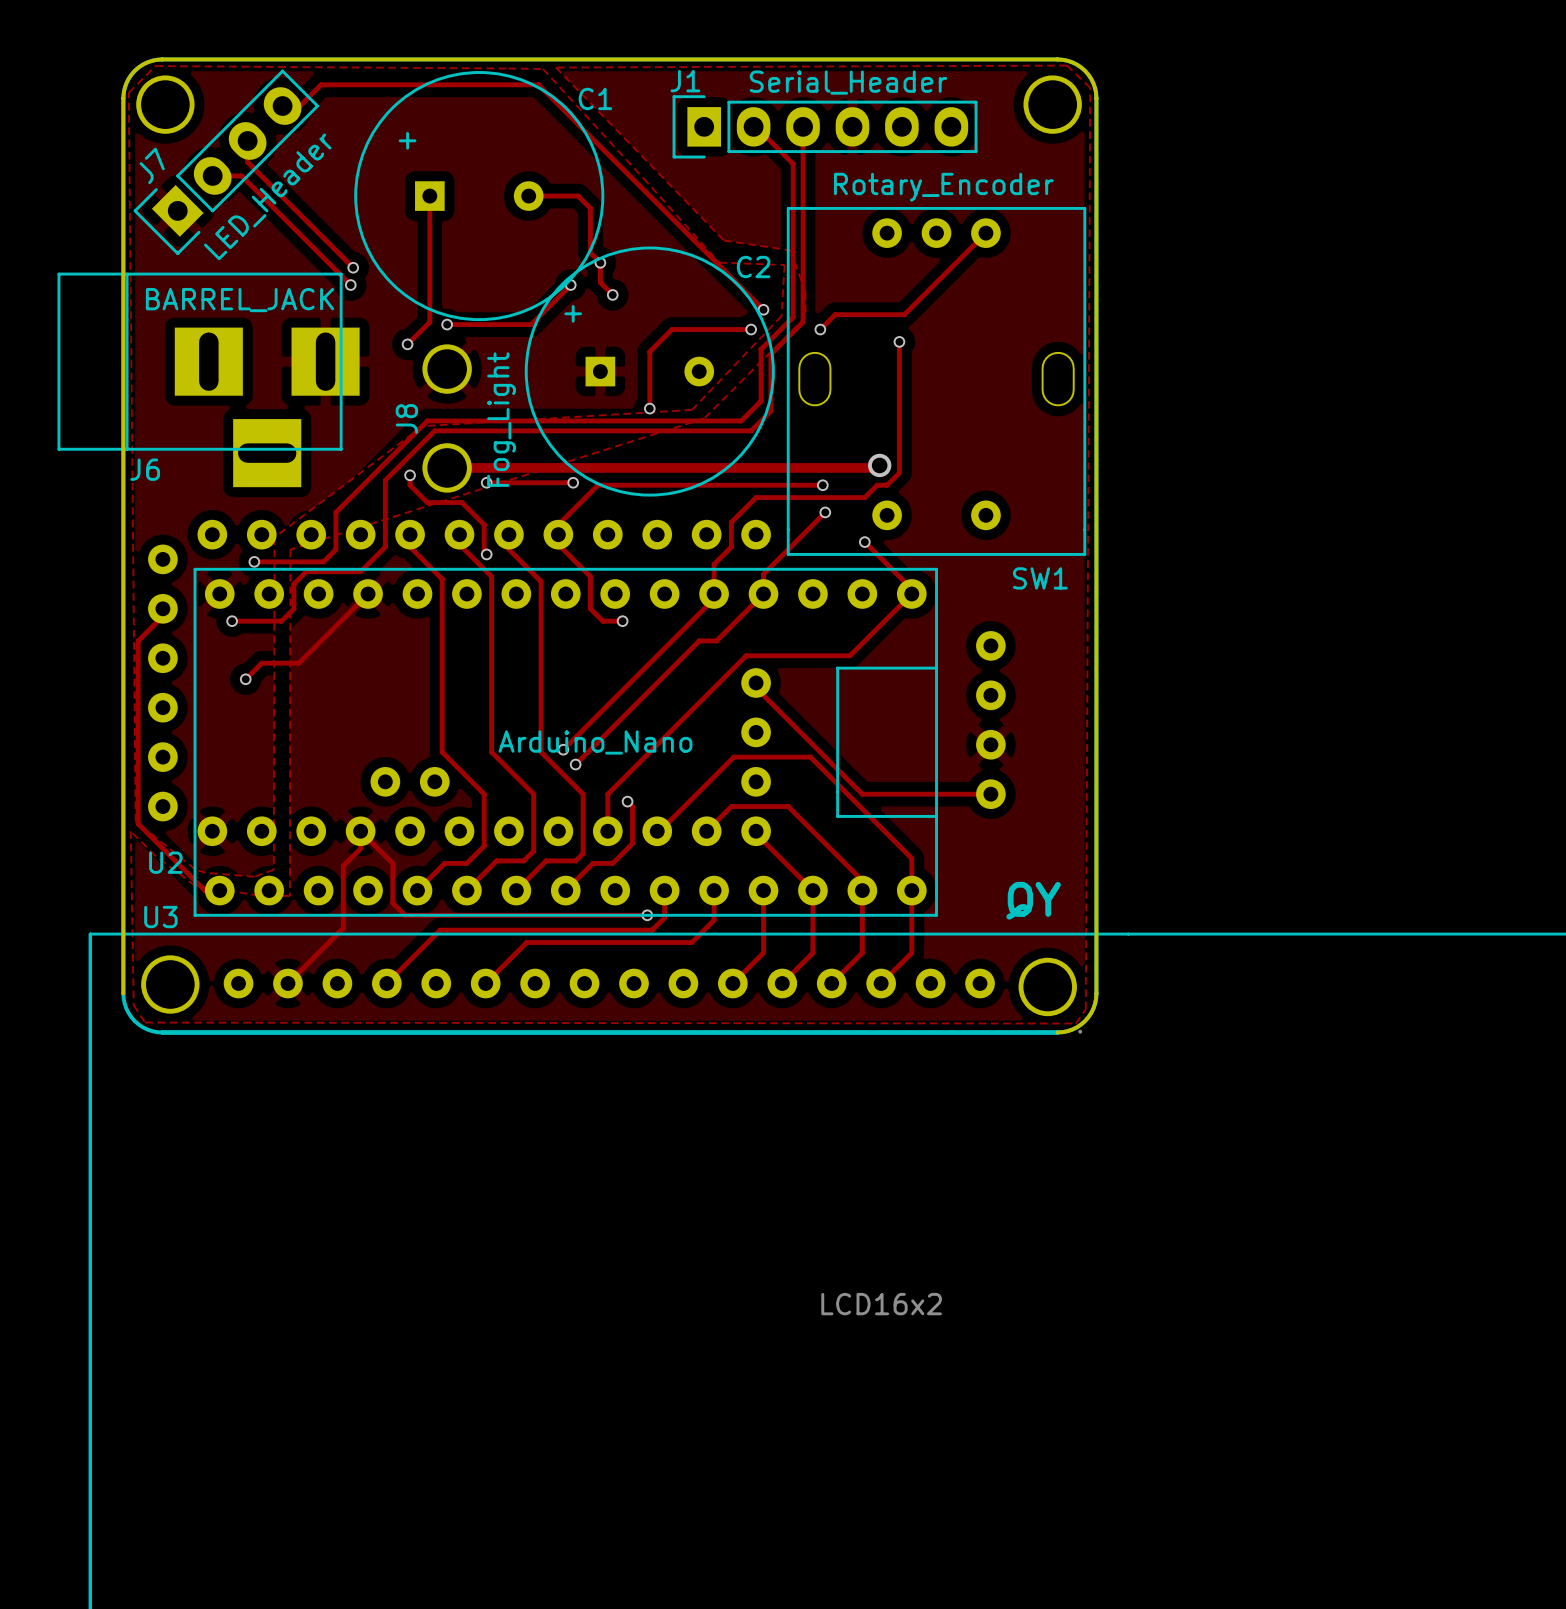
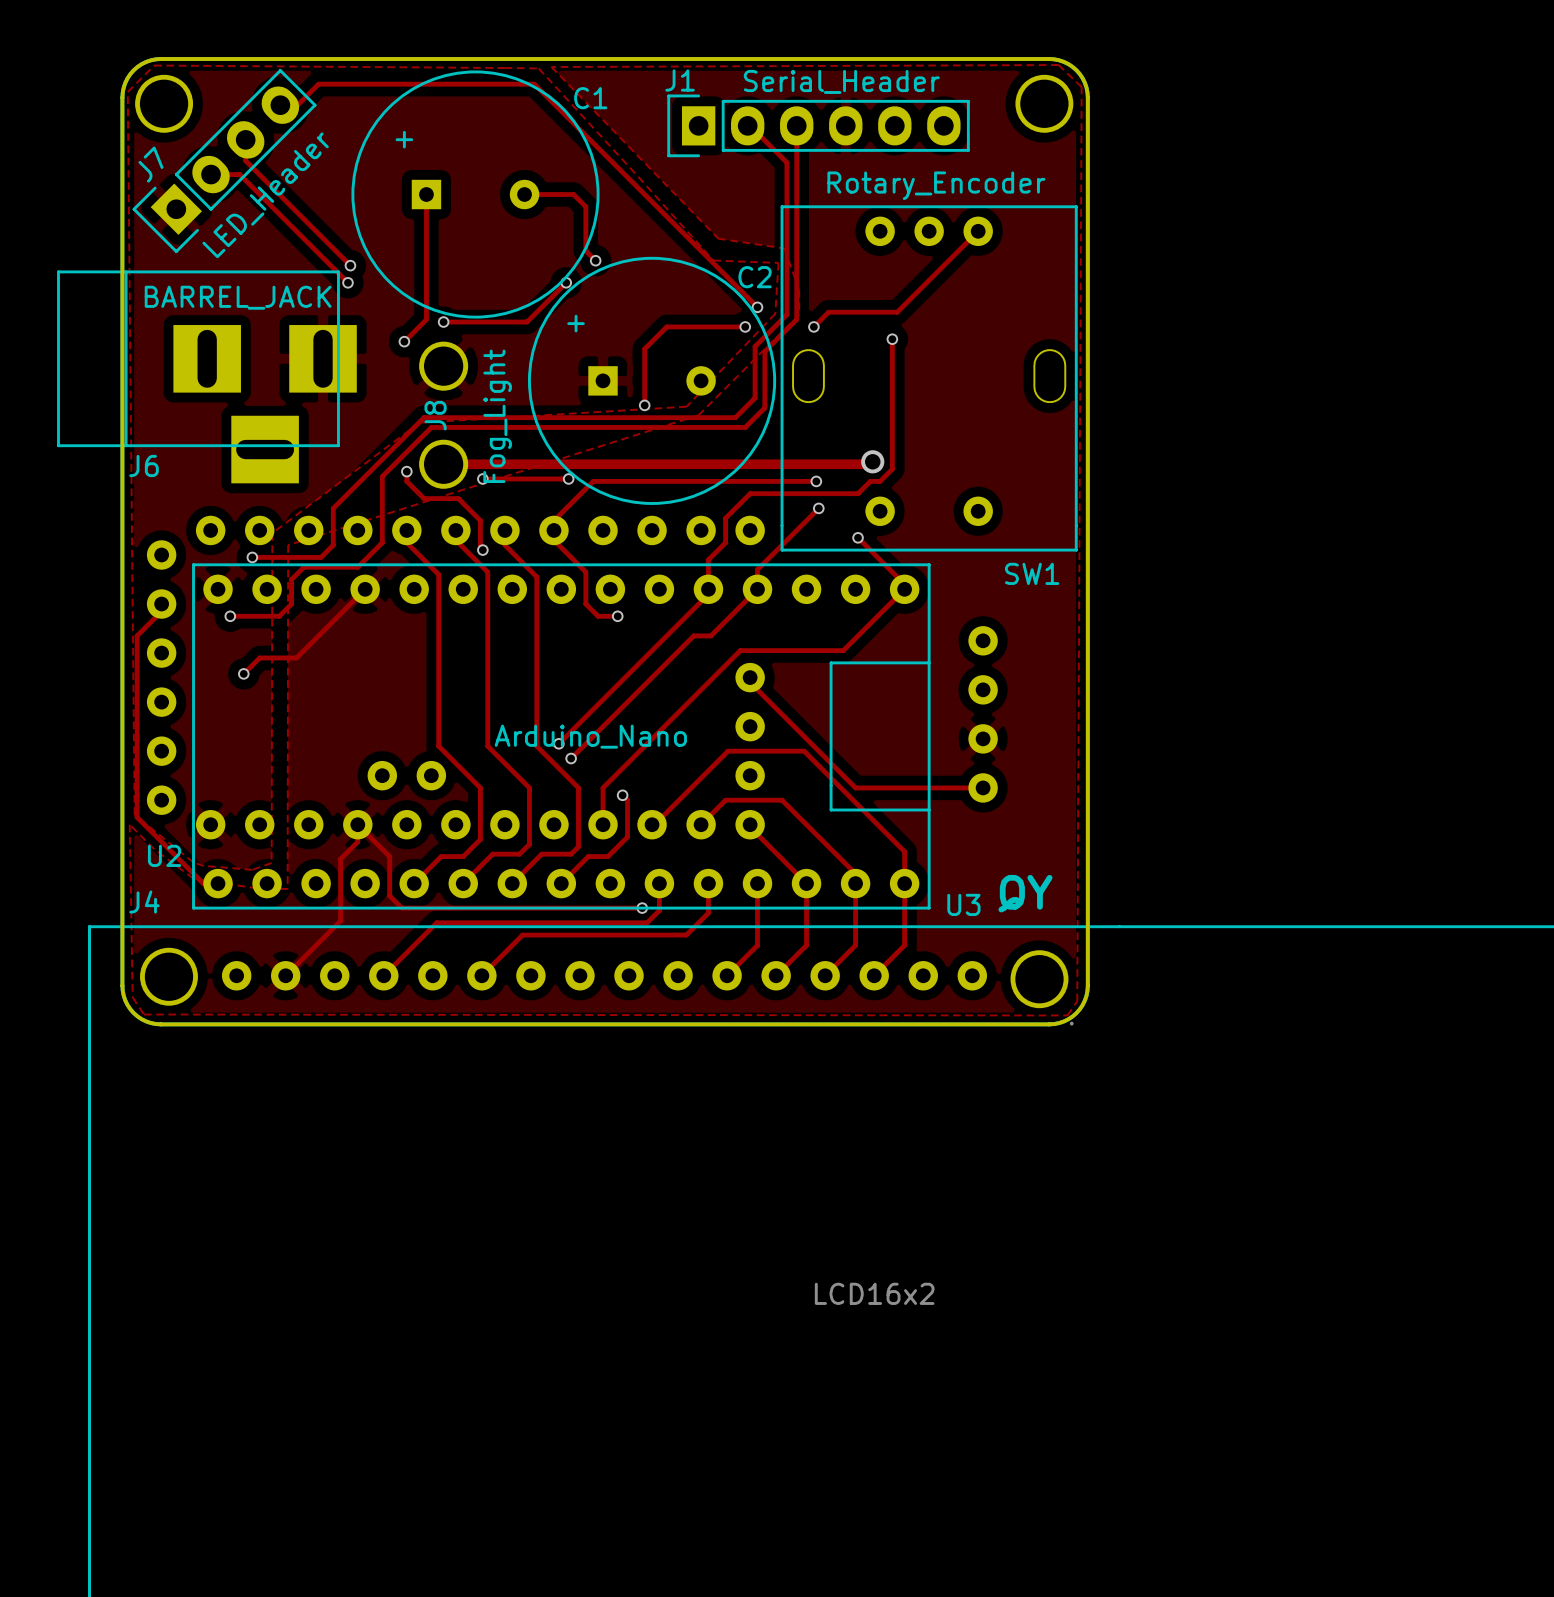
track: (600, 262) (600, 282) (612, 294) -> none
via: (612, 294) -> none
C2 position: (649, 371) -> (652, 380)
J8 name position: J8 (406, 418) -> J8 (435, 415)
J4 name: none -> J4 (144, 902)
U3 name position: U3 (160, 917) -> U3 (963, 904)
board edge: none -> (122, 985) (125, 1000) (133, 1013) (146, 1021) (161, 1024) (1049, 1024)

